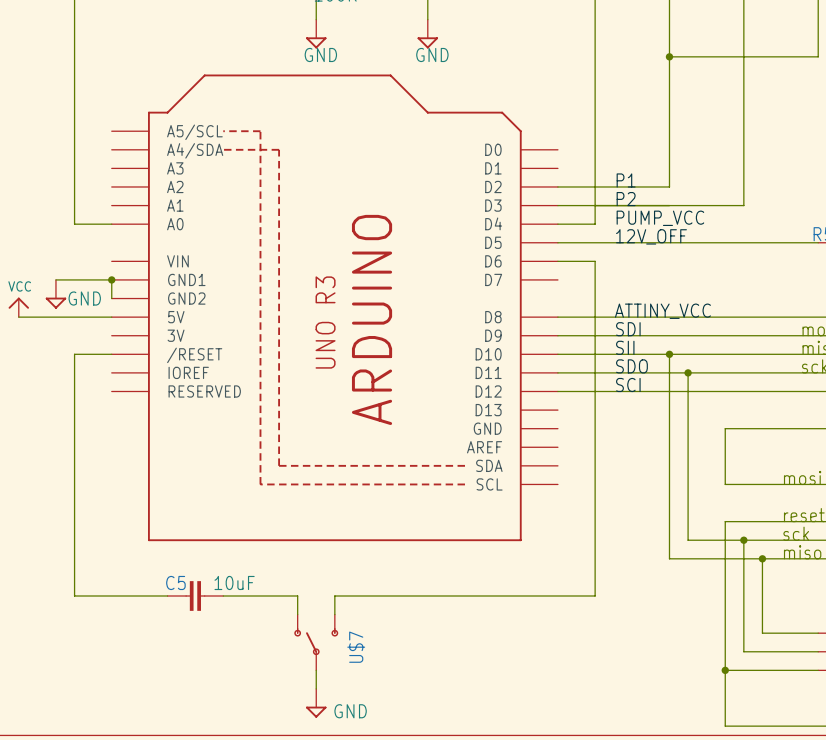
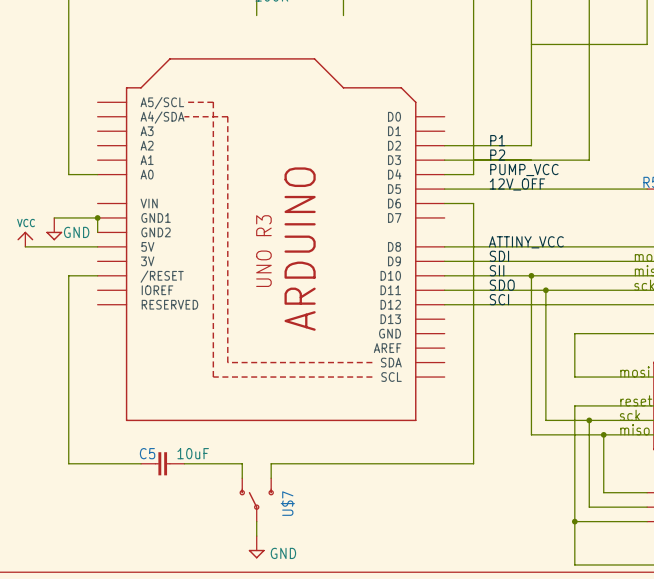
power symbol: GND (316, 34) -> none
power symbol: GND (427, 34) -> none
junction: (669, 56) -> none

